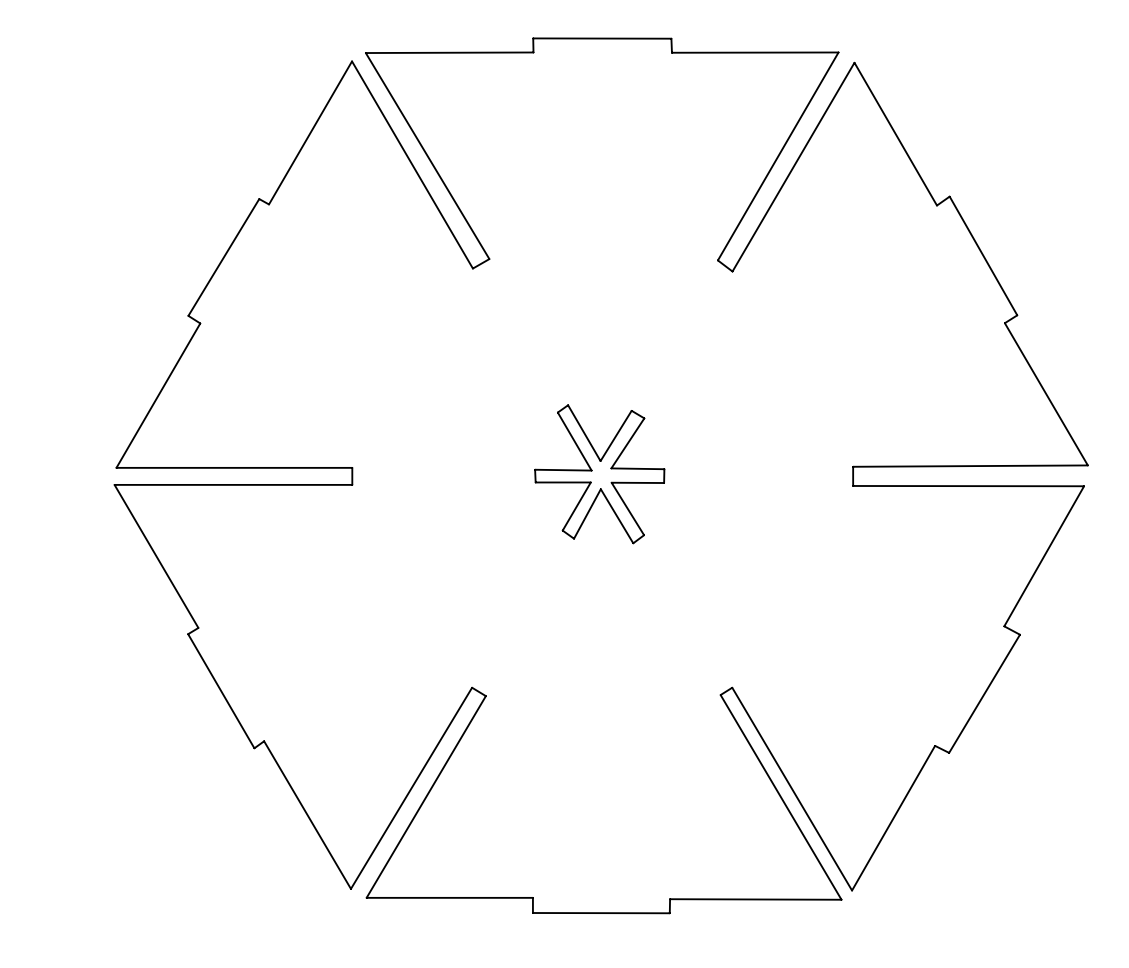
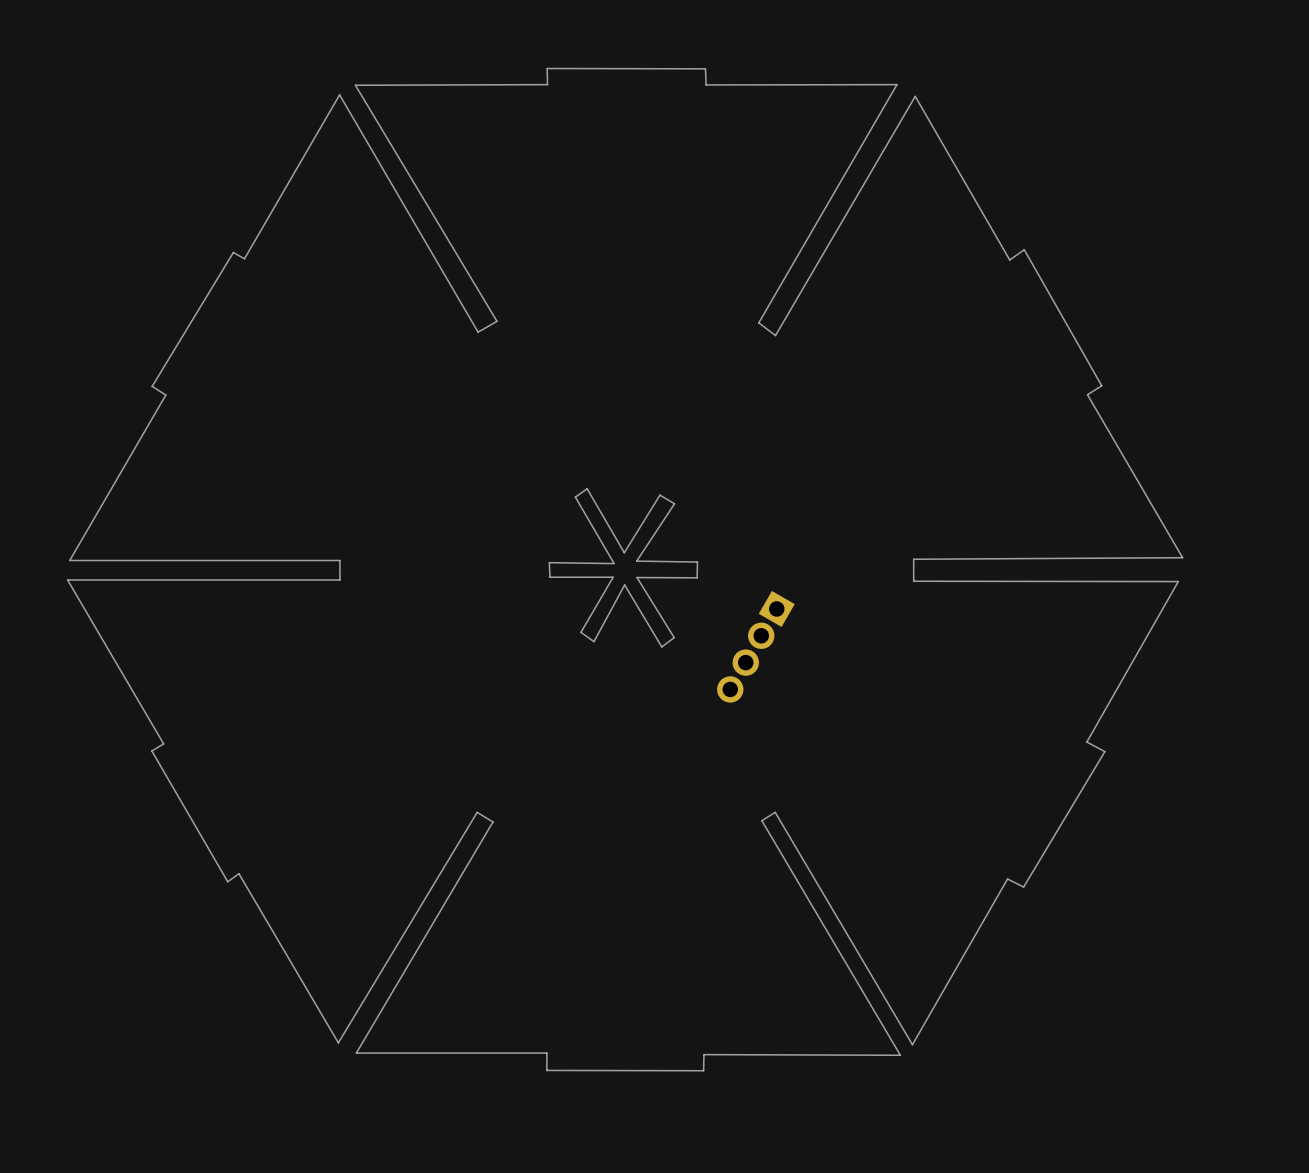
part: none -> (755, 646)

